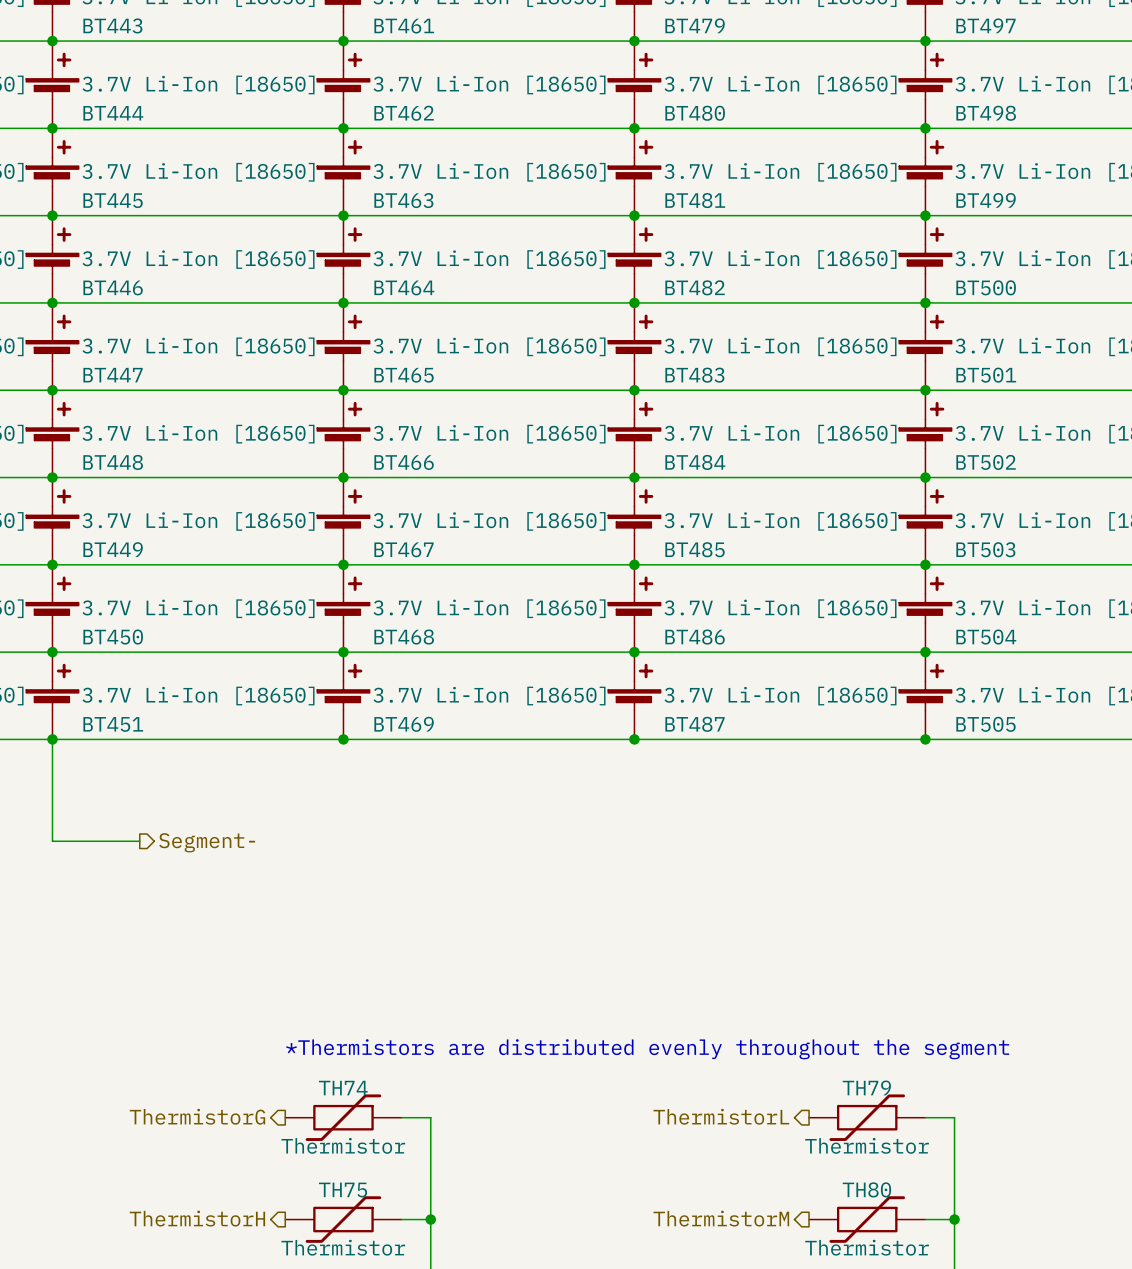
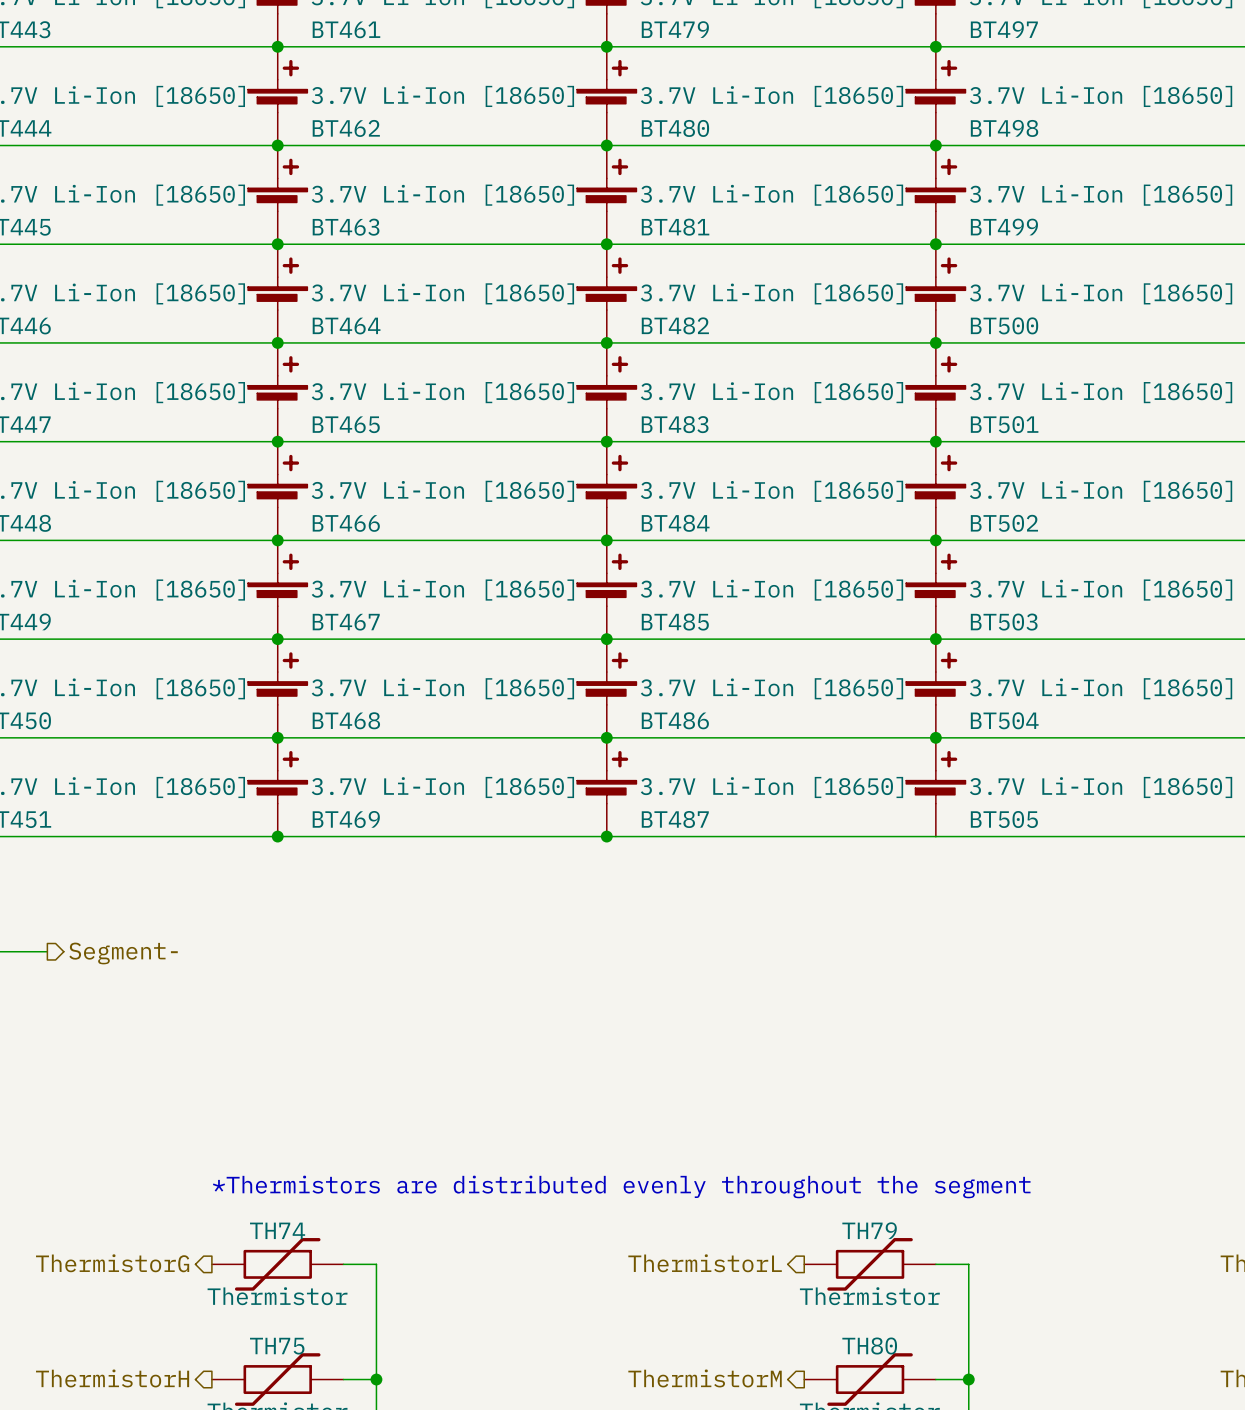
junction: (925, 739) -> none

